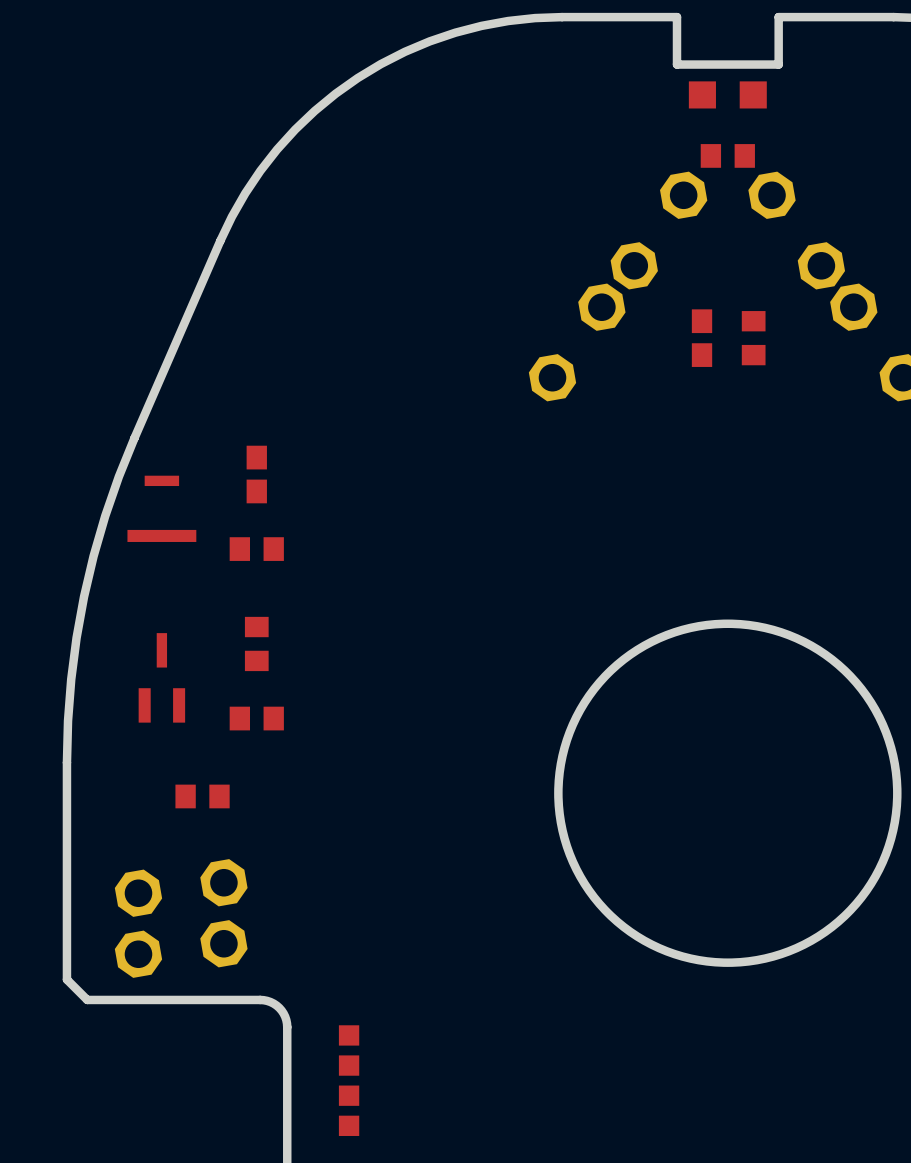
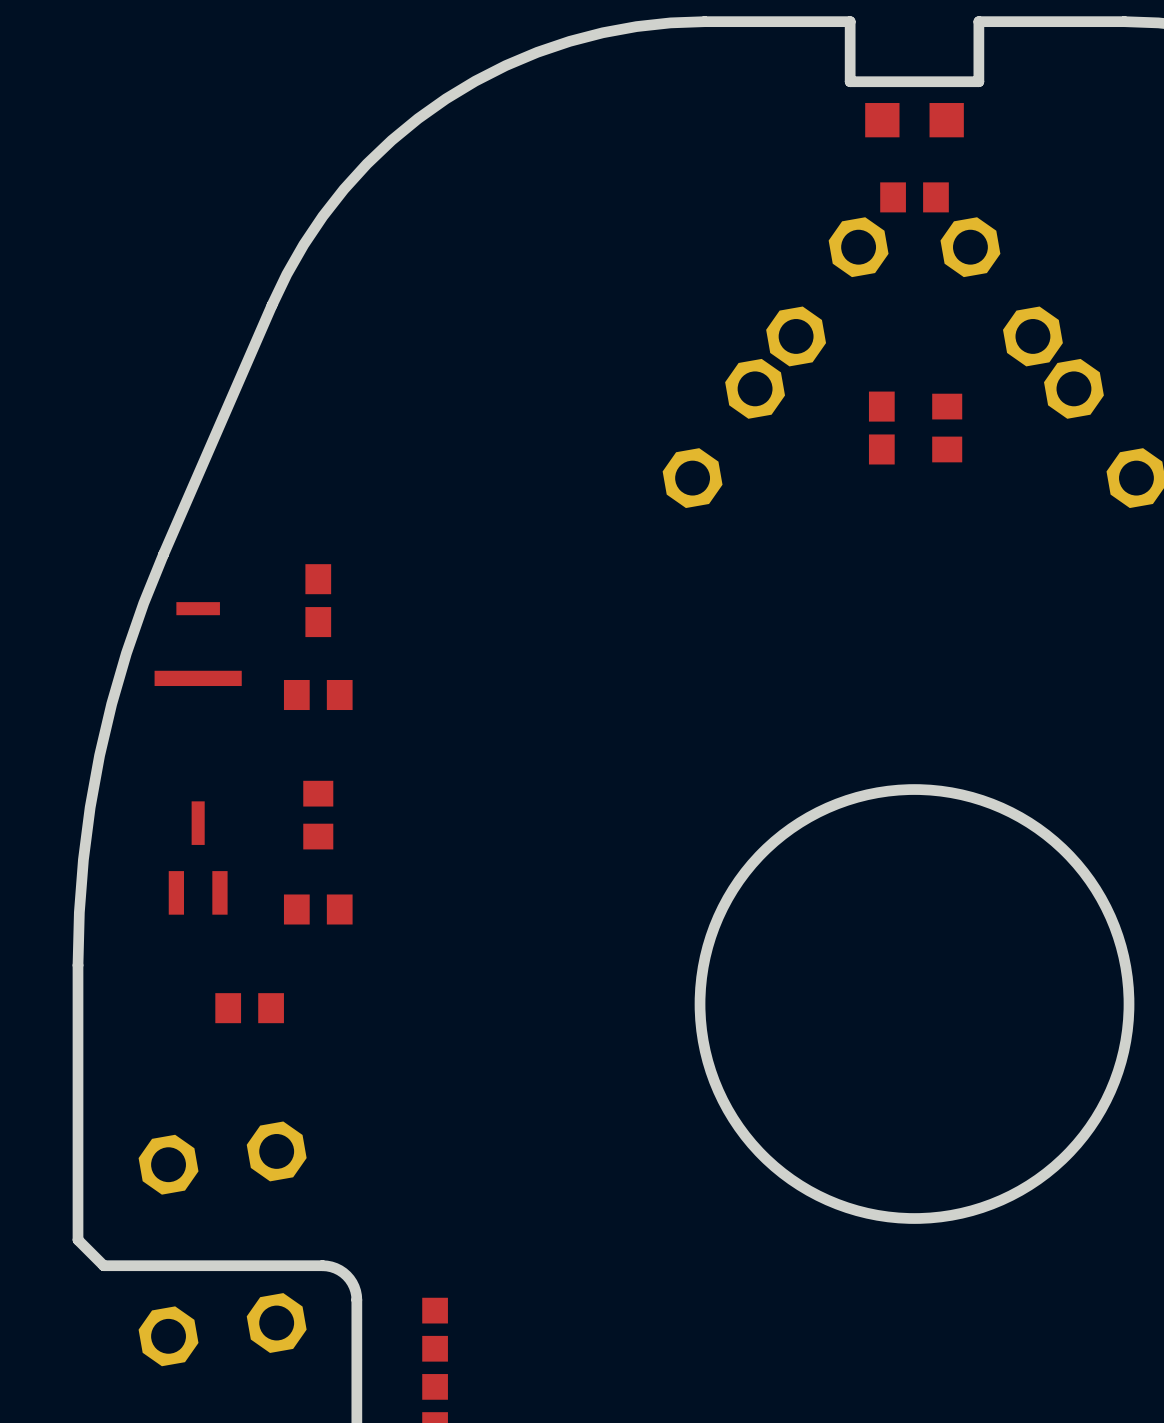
part: (181, 887) -> none
part: none -> (222, 1158)
part: (181, 948) -> none
part: none -> (222, 1329)

